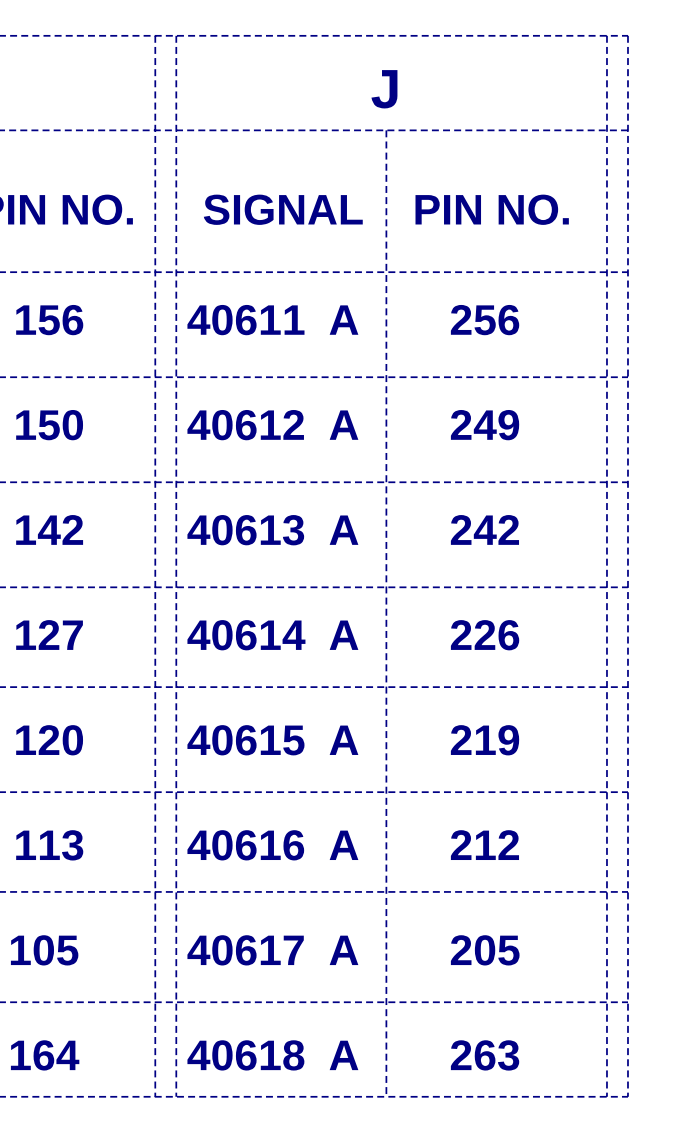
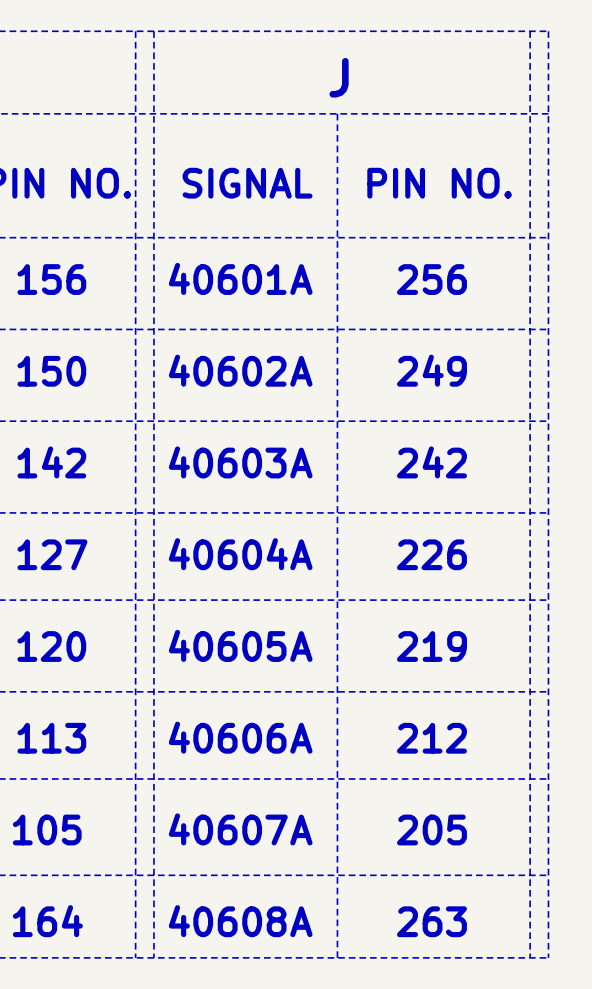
text: 40611 (245, 320) -> 40601 (227, 278)
text: 40612 (245, 425) -> 40602 (227, 370)
text: 40613 (245, 530) -> 40603 (227, 462)
text: 40614 (246, 635) -> 40604 (228, 554)
text: 40615 (245, 740) -> 40605 (227, 645)
text: 40616 (245, 845) -> 40606 (227, 737)
text: 40617 (245, 950) -> 40607 (228, 829)
text: 40618 (245, 1055) -> 40608 (227, 921)

